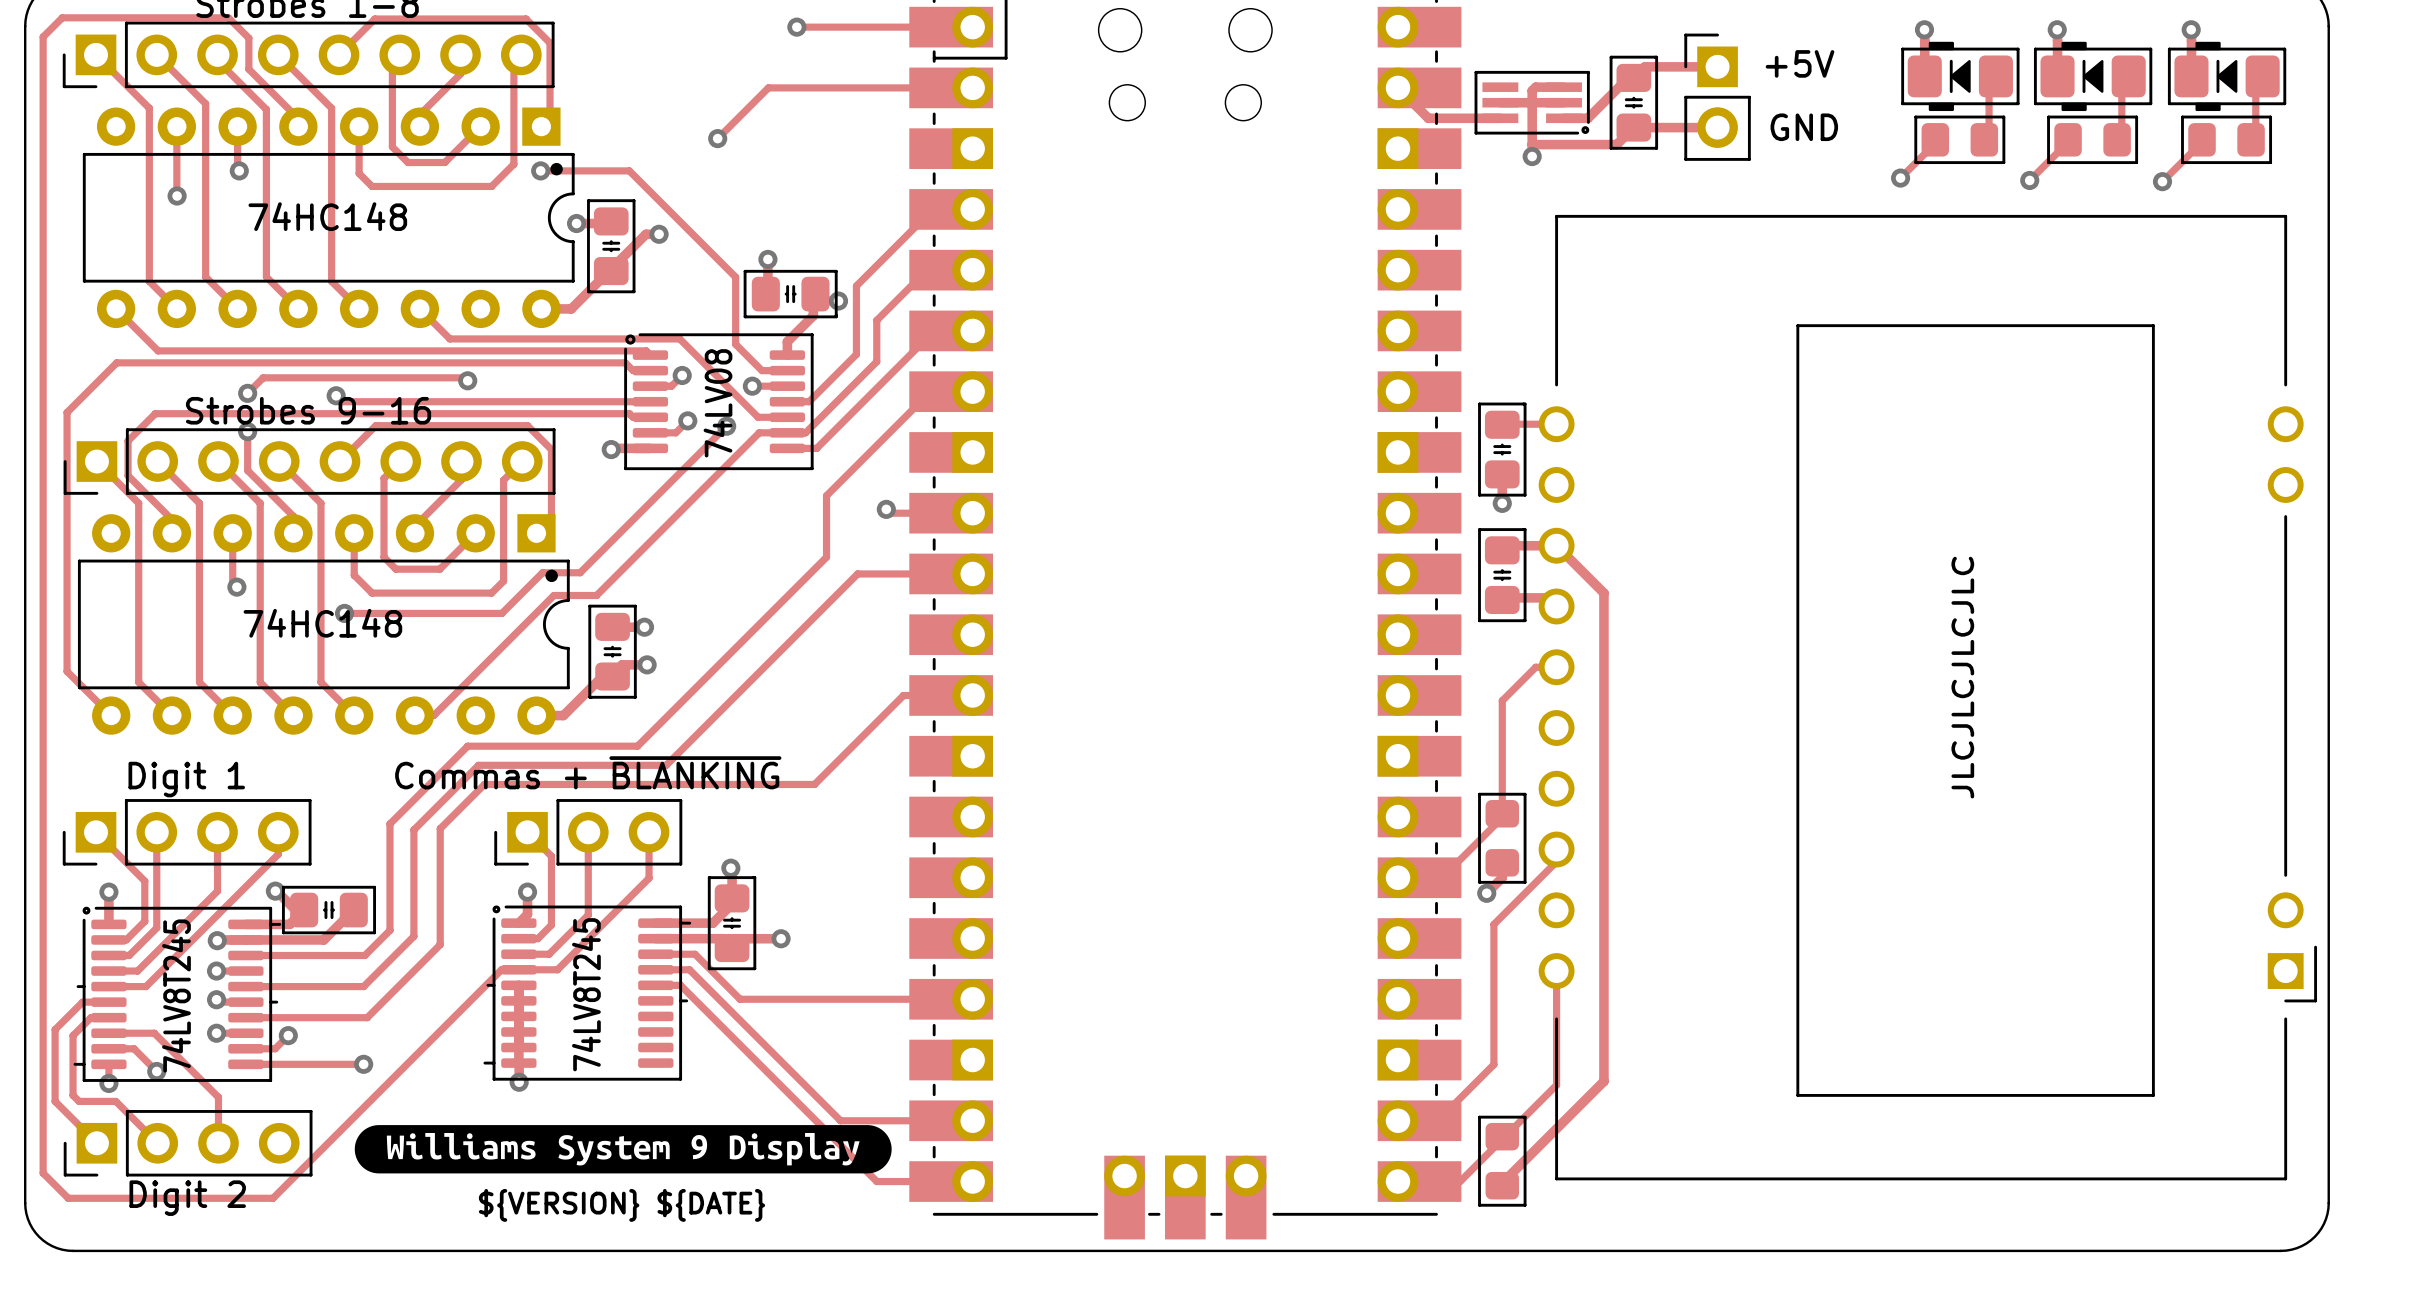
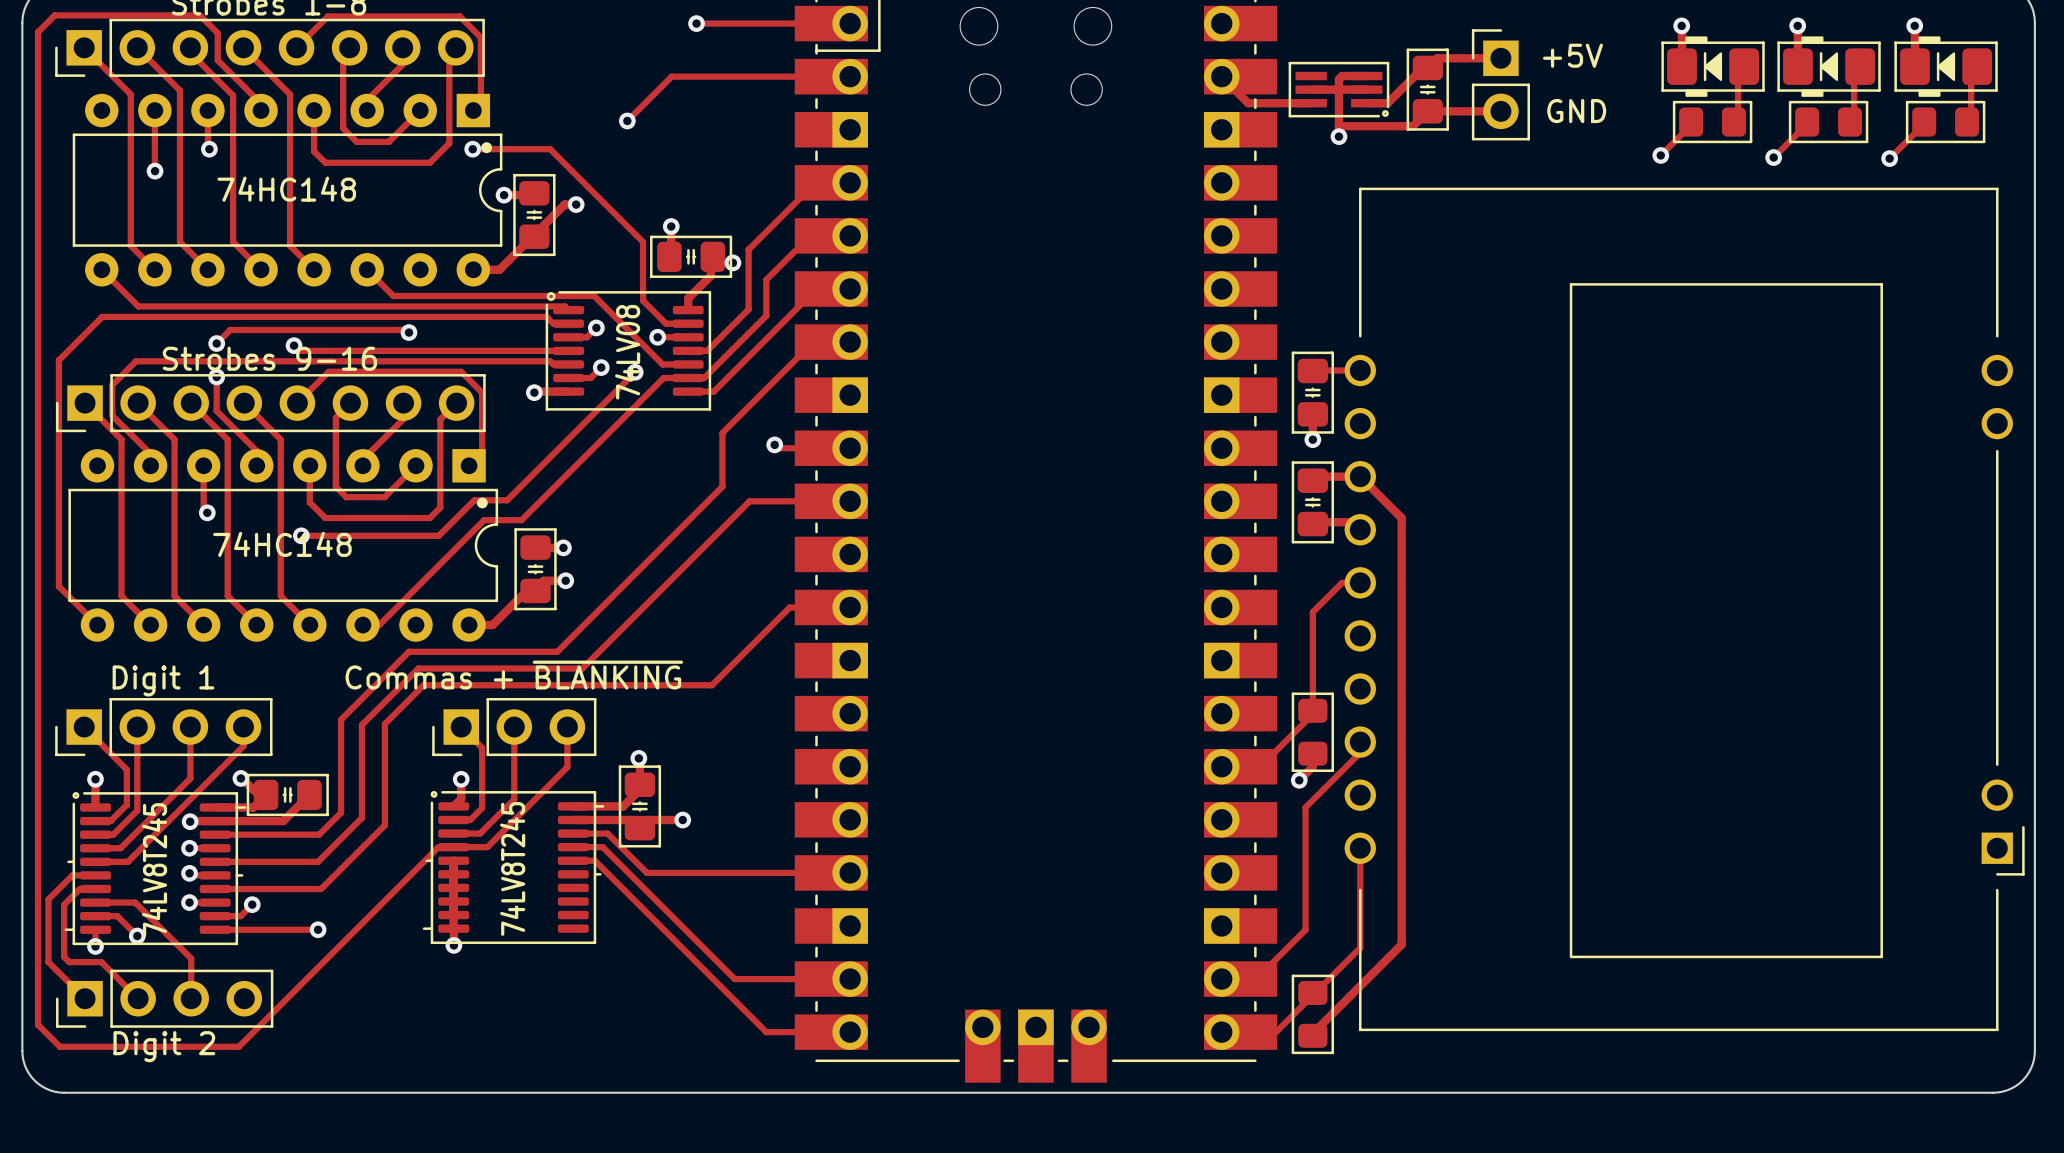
text: JLCJLCJLCJLC (1962, 677) -> none
drawing: [354, 1125, 892, 1174] -> none
text: ${VERSION} ${DATE} (622, 1205) -> none

